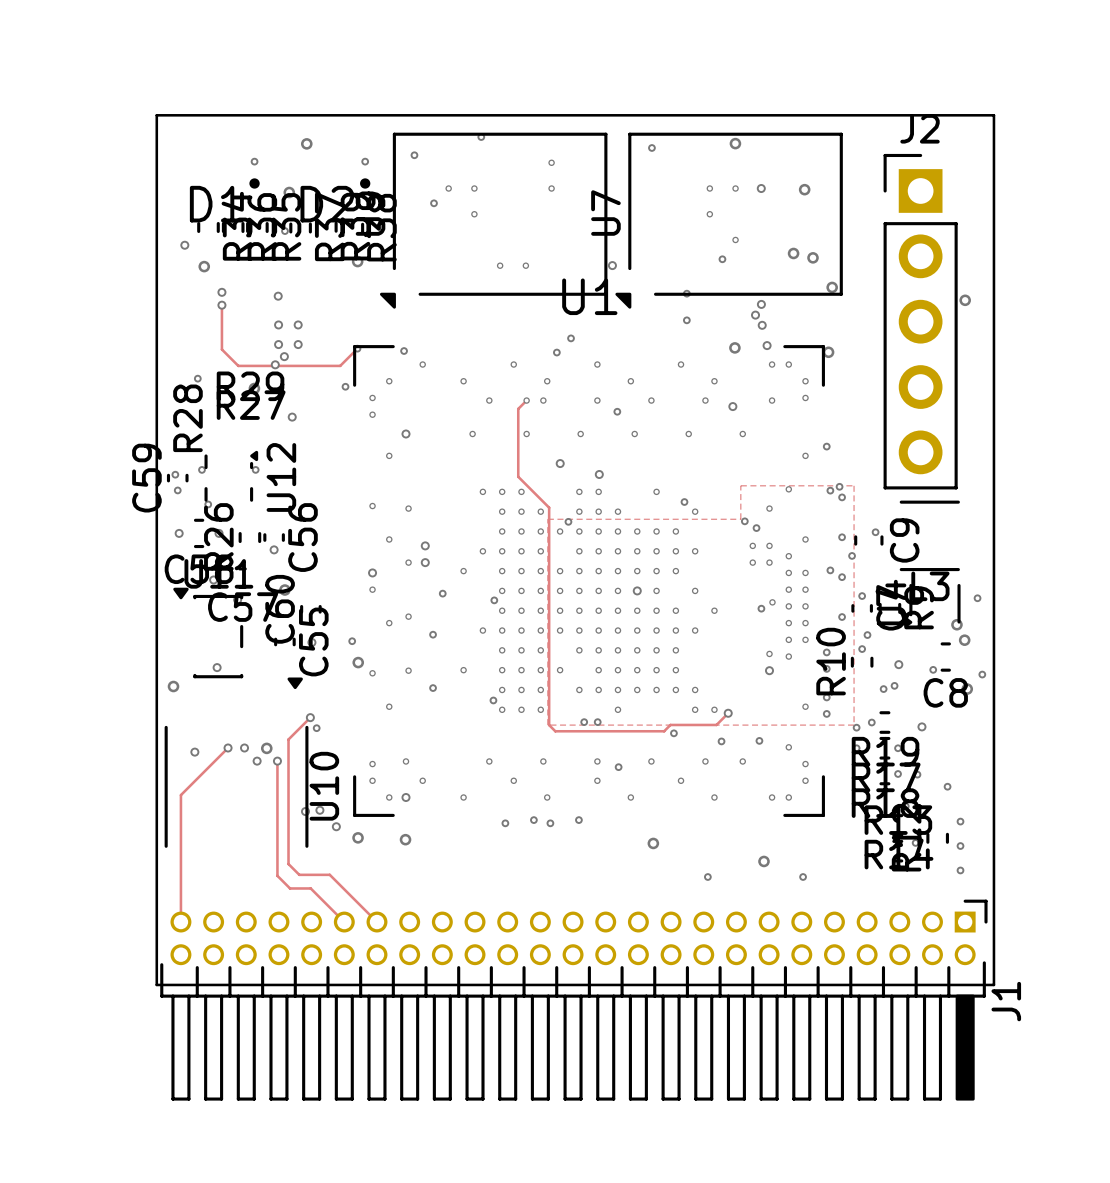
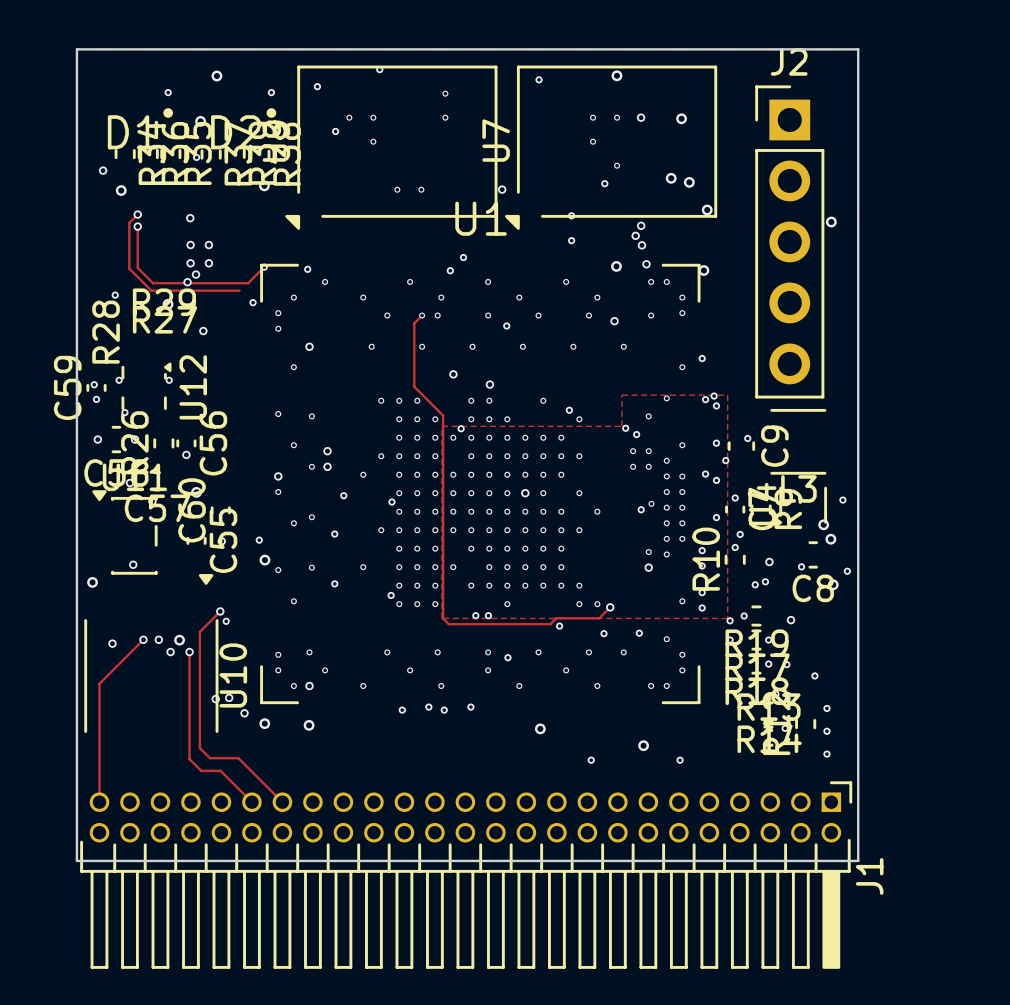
track: none -> (137, 214) (129, 222) (129, 268) (151, 290) (239, 290)

